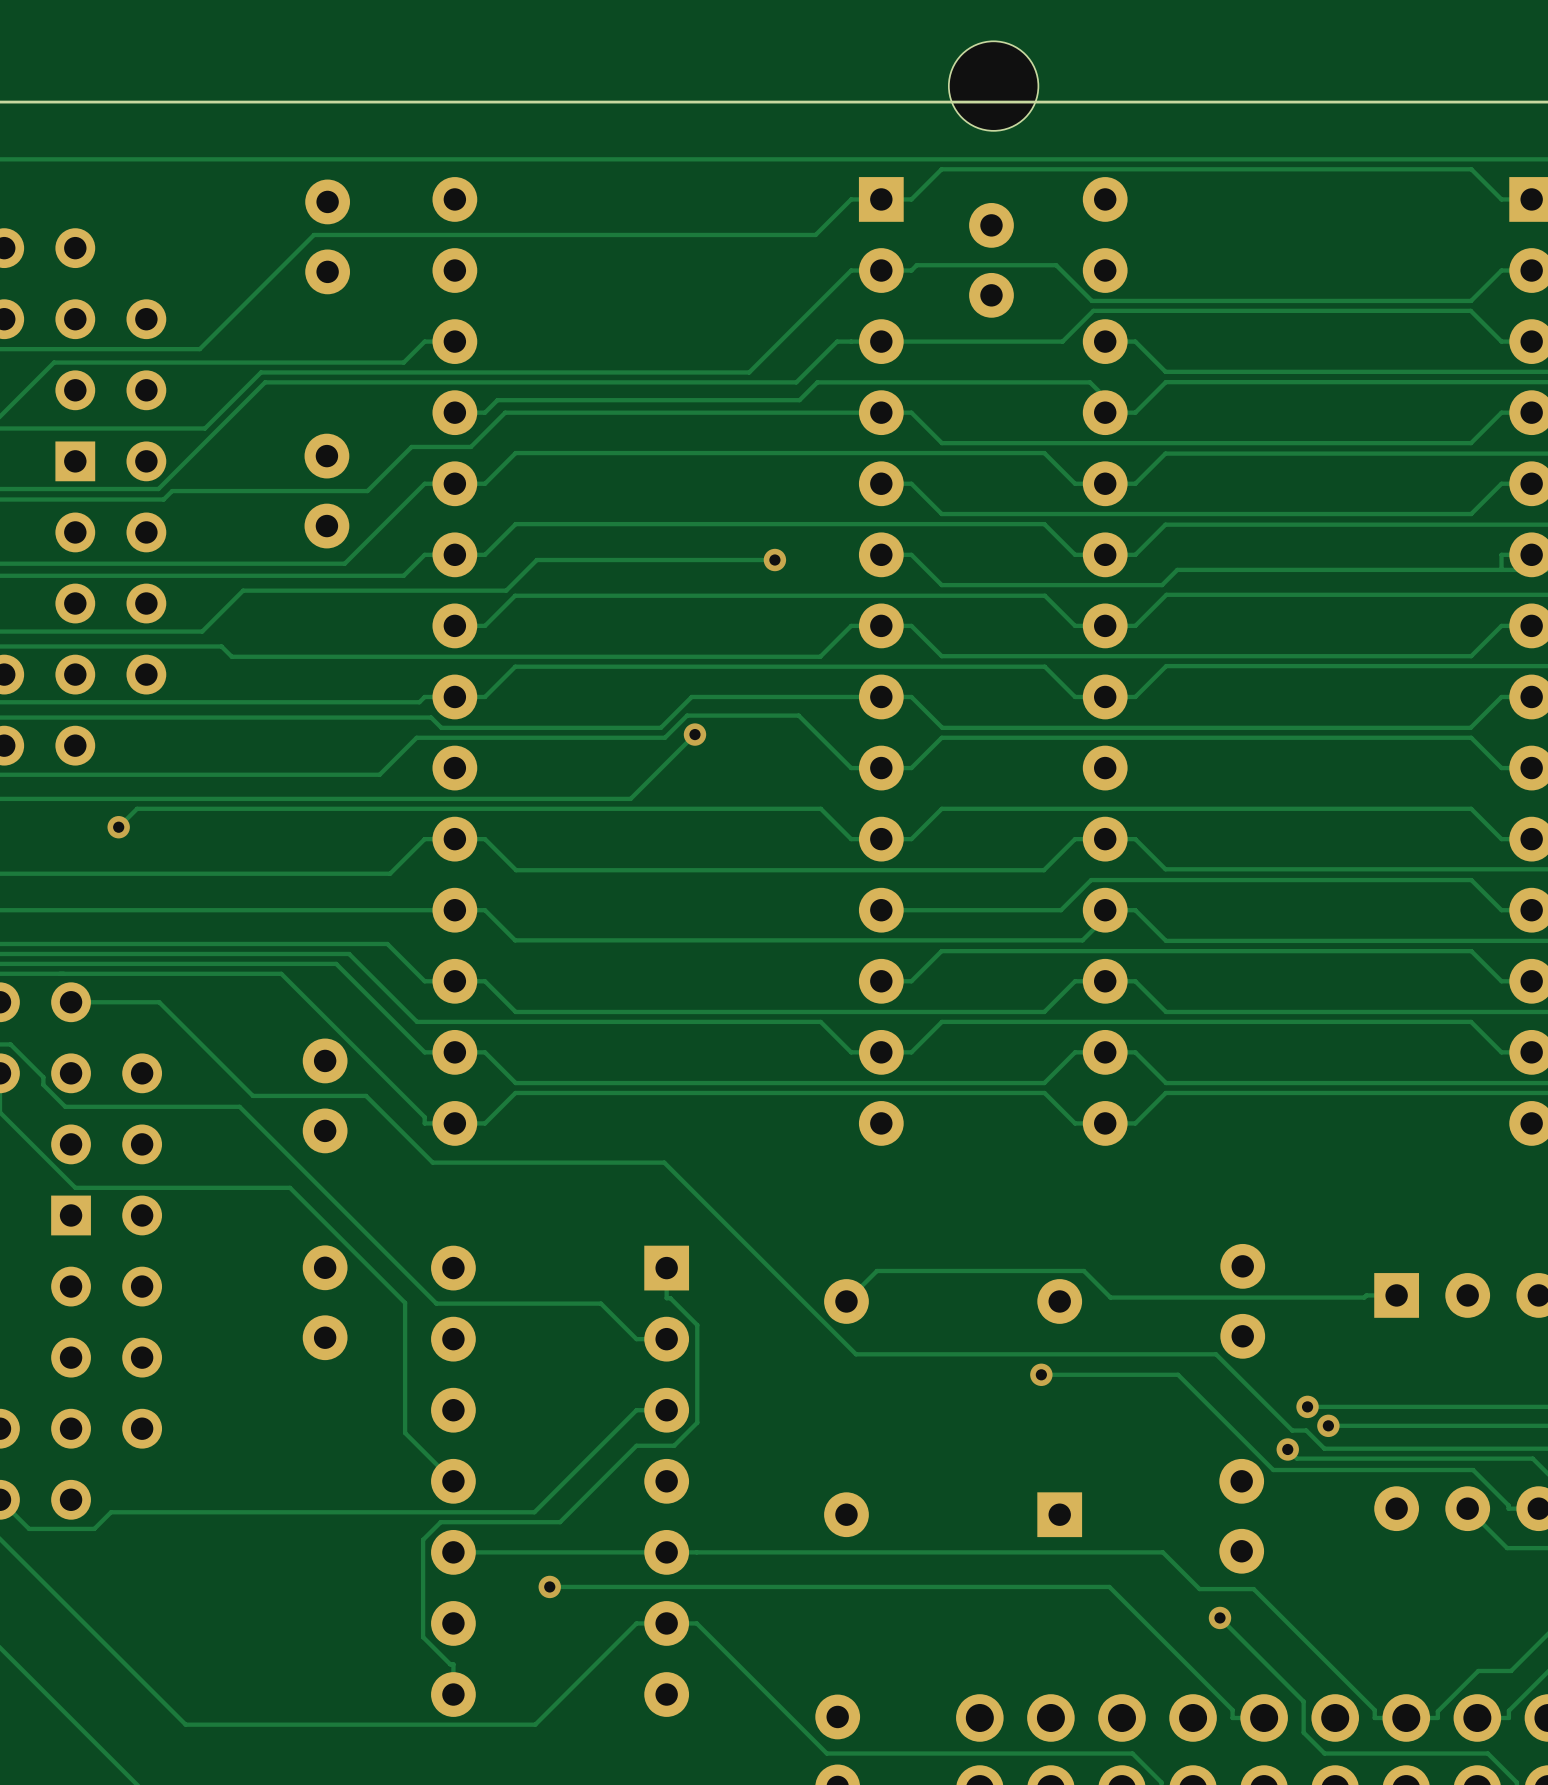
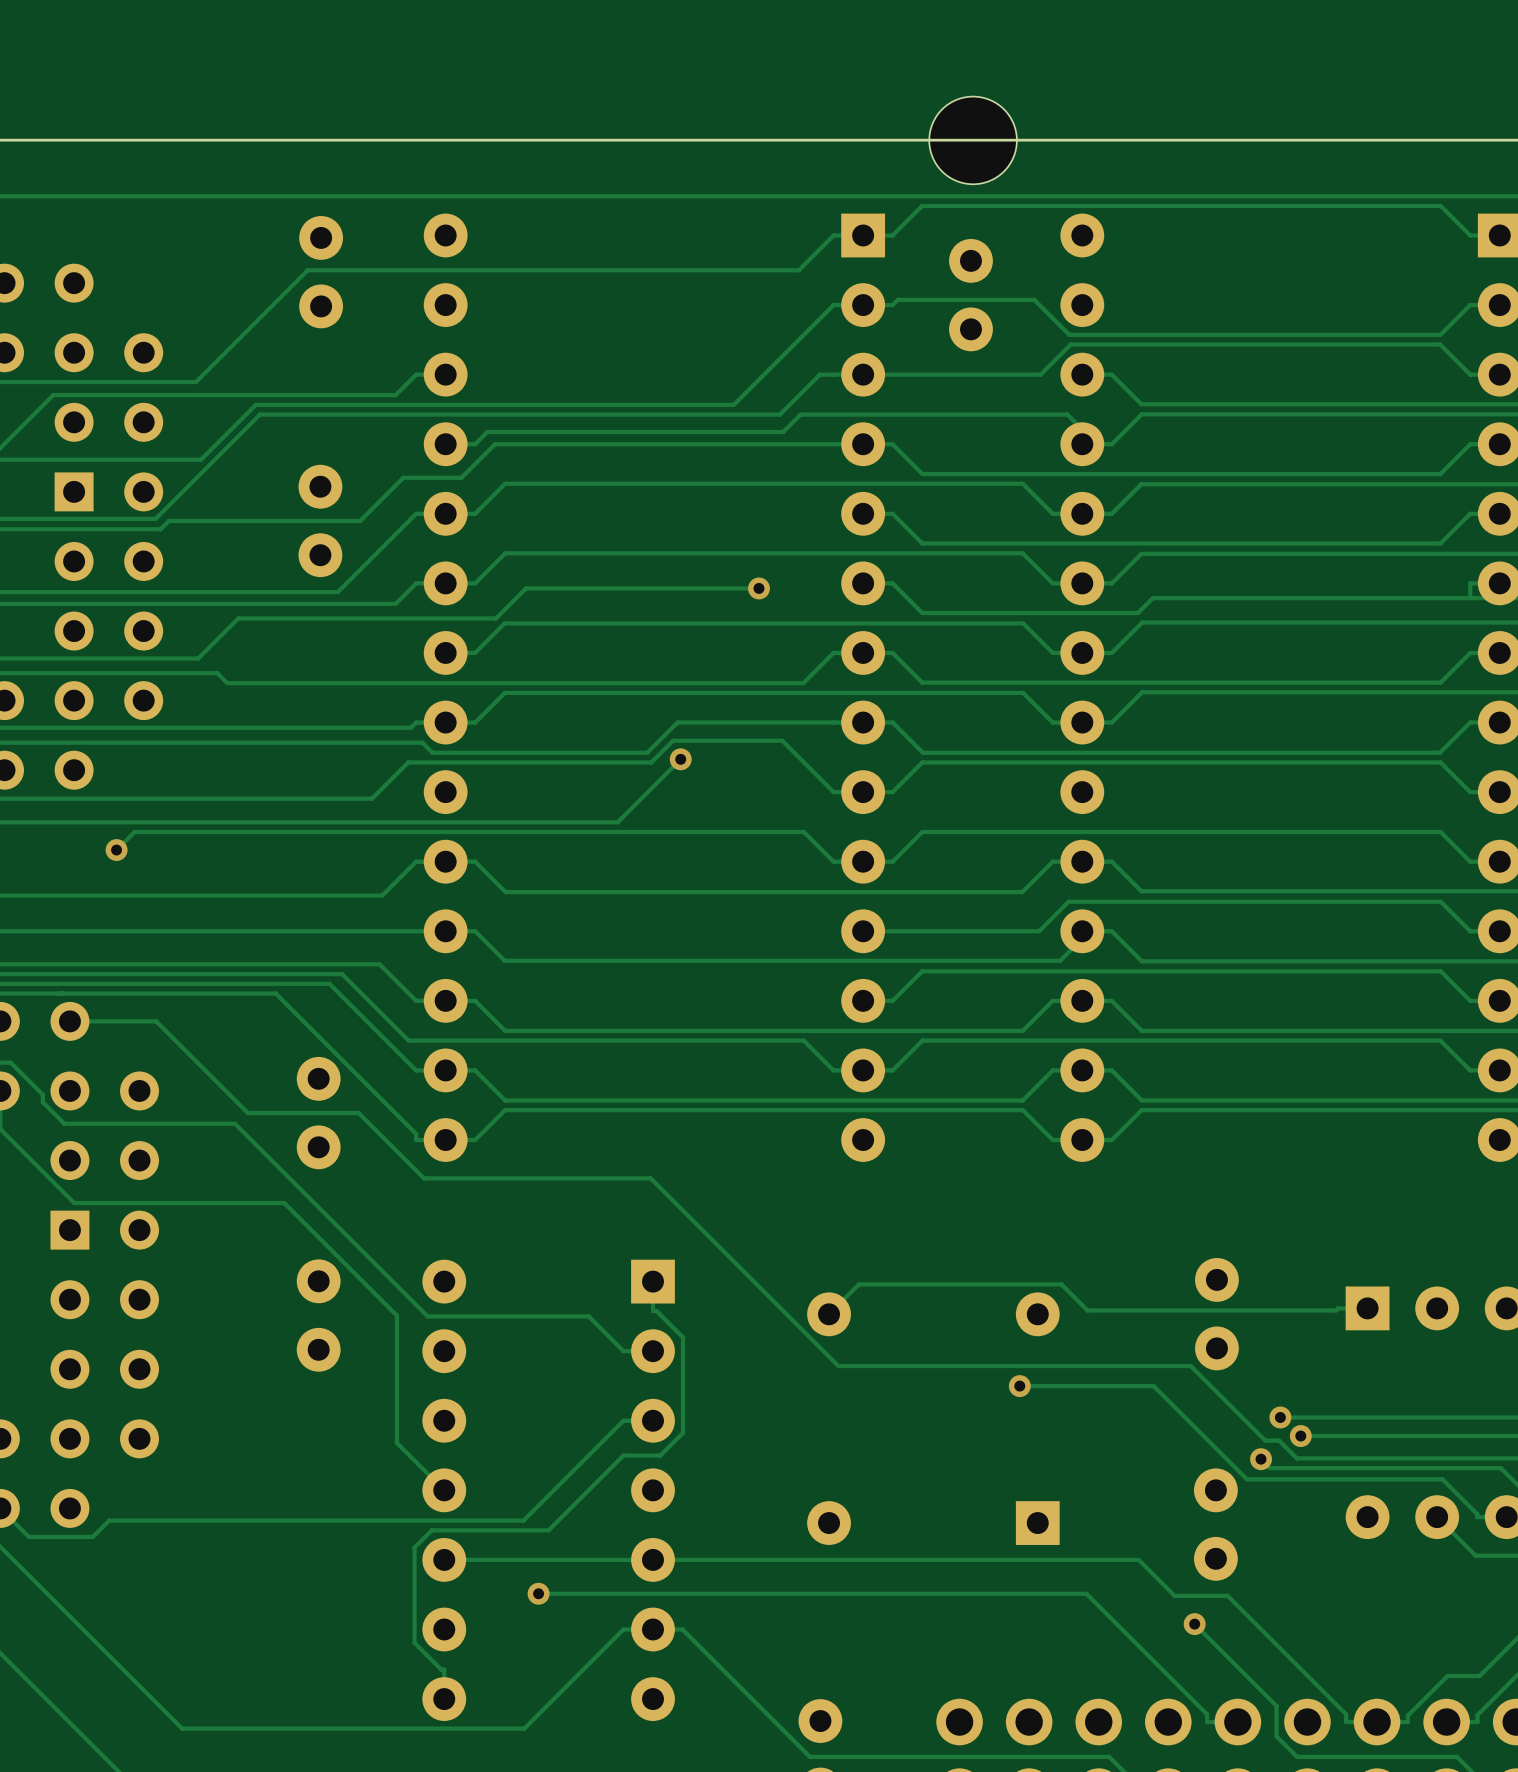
part position: (993, 86) -> (973, 140)

